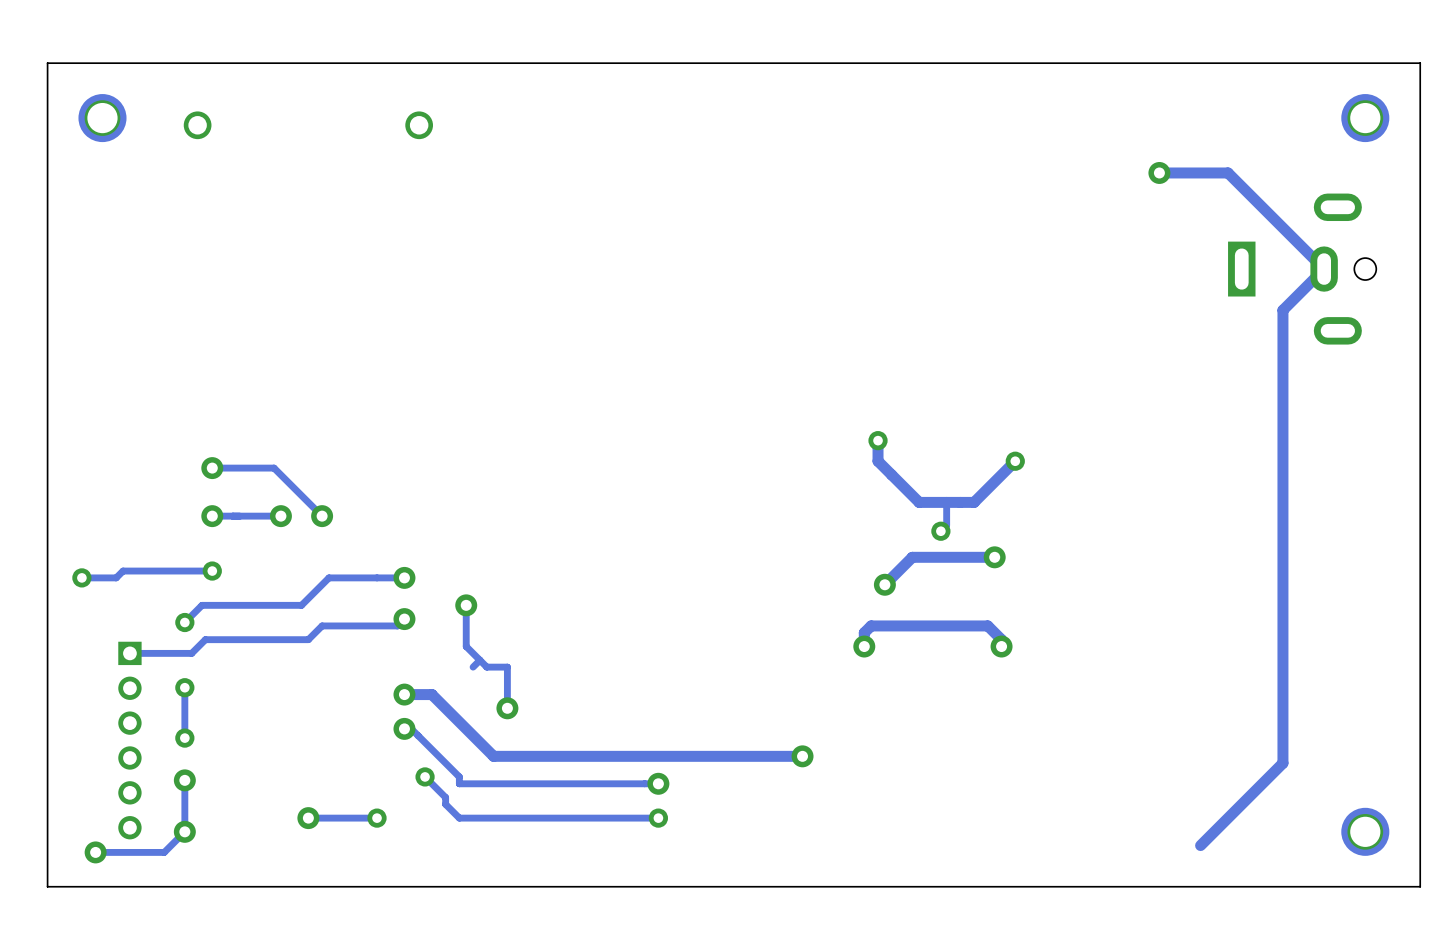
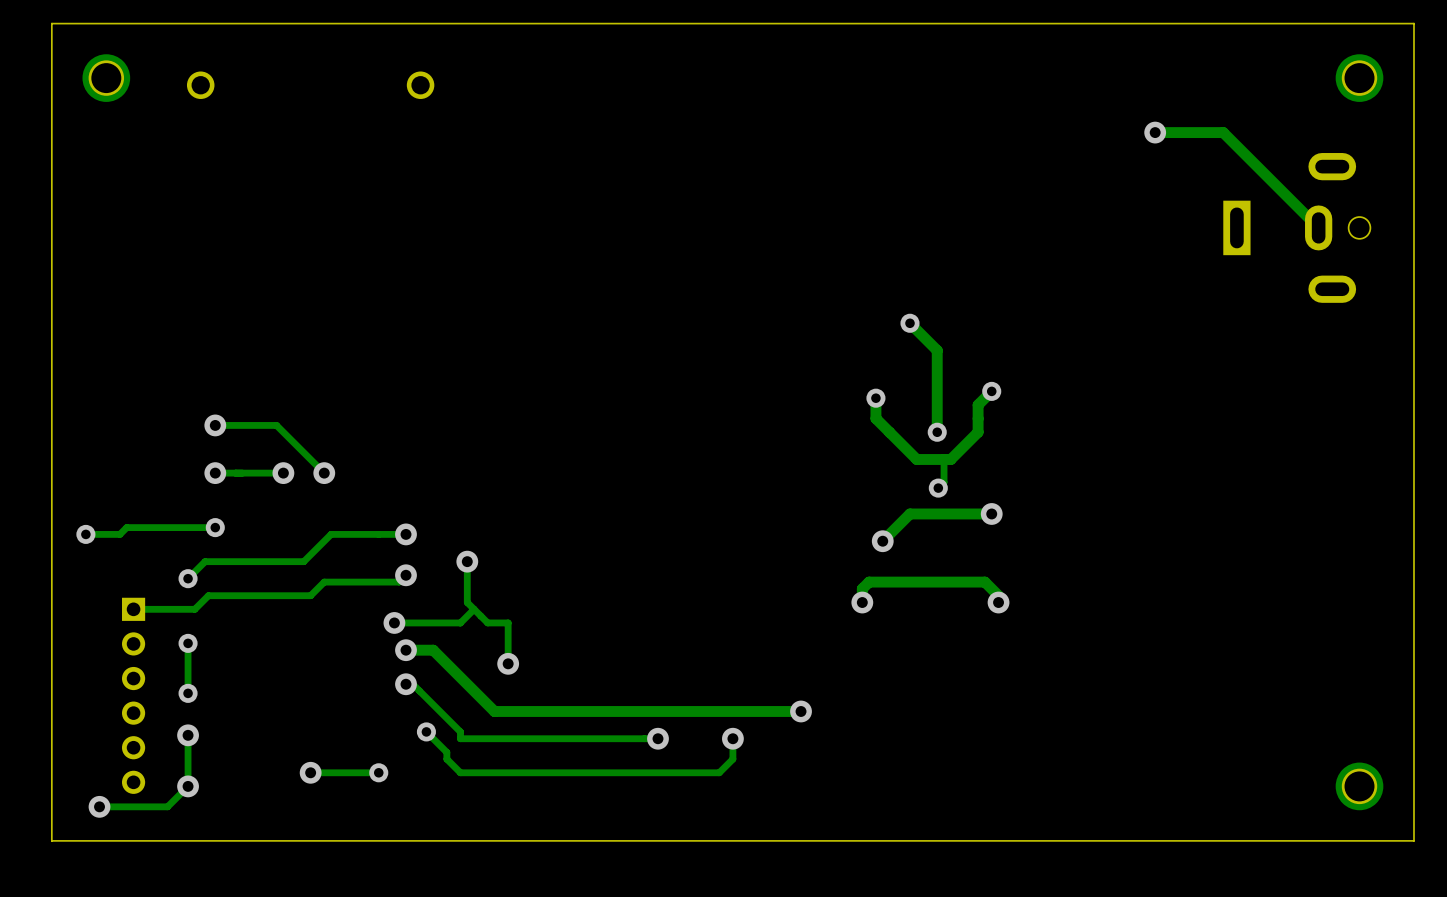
track: (1324, 269) (1282, 310) (1282, 763) (1200, 845) -> none
track: none -> (909, 323) (937, 350) (937, 432)
via: none -> (909, 323)
track: (1015, 461) (974, 502) (953, 502) -> (991, 391) (978, 405) (978, 432) (950, 459)
via position: (1015, 461) -> (991, 391)
via: none -> (937, 432)
track: none -> (474, 609) (460, 622) (394, 622)
track: (479, 660) (473, 667) -> none
via: none -> (394, 622)
track: none -> (732, 738) (732, 759) (719, 772) (658, 772)
via: none -> (732, 738)
via: (658, 818) -> none

